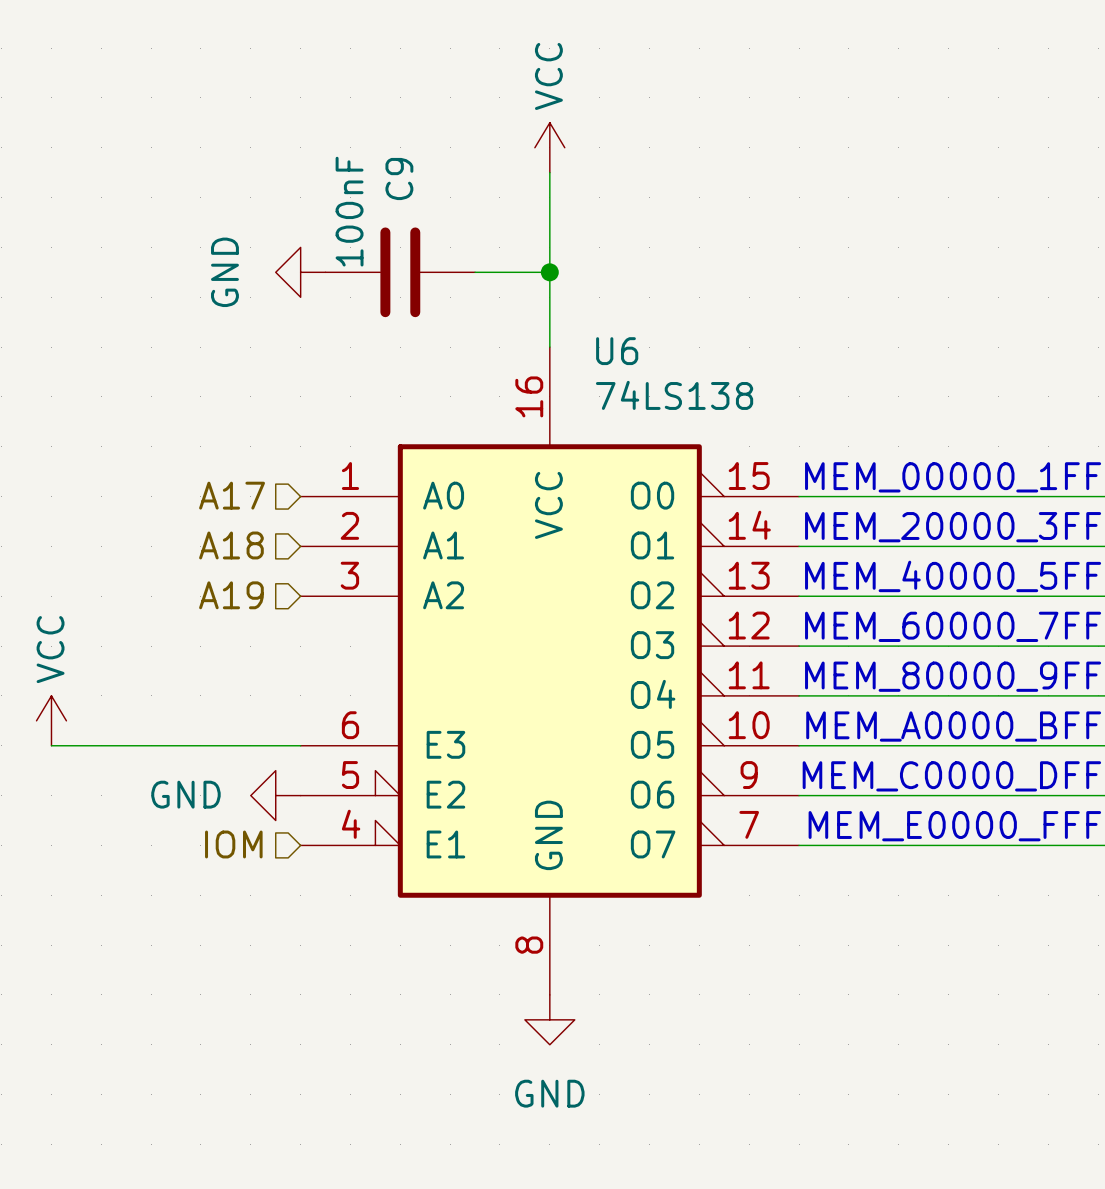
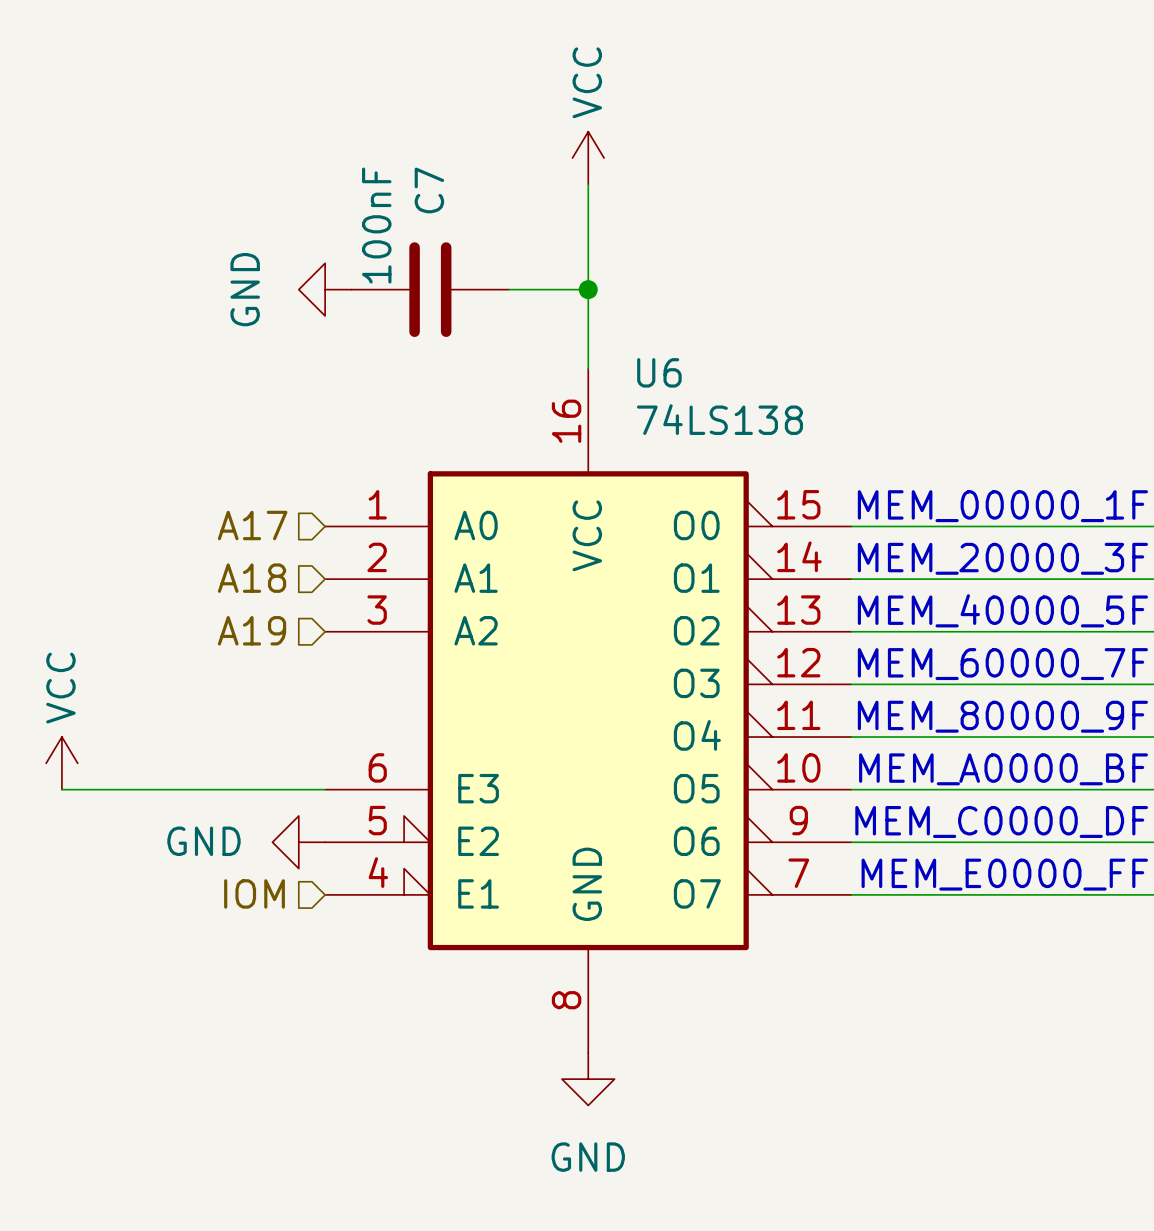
C9 name: C9 (399, 179) -> C7 (429, 190)

